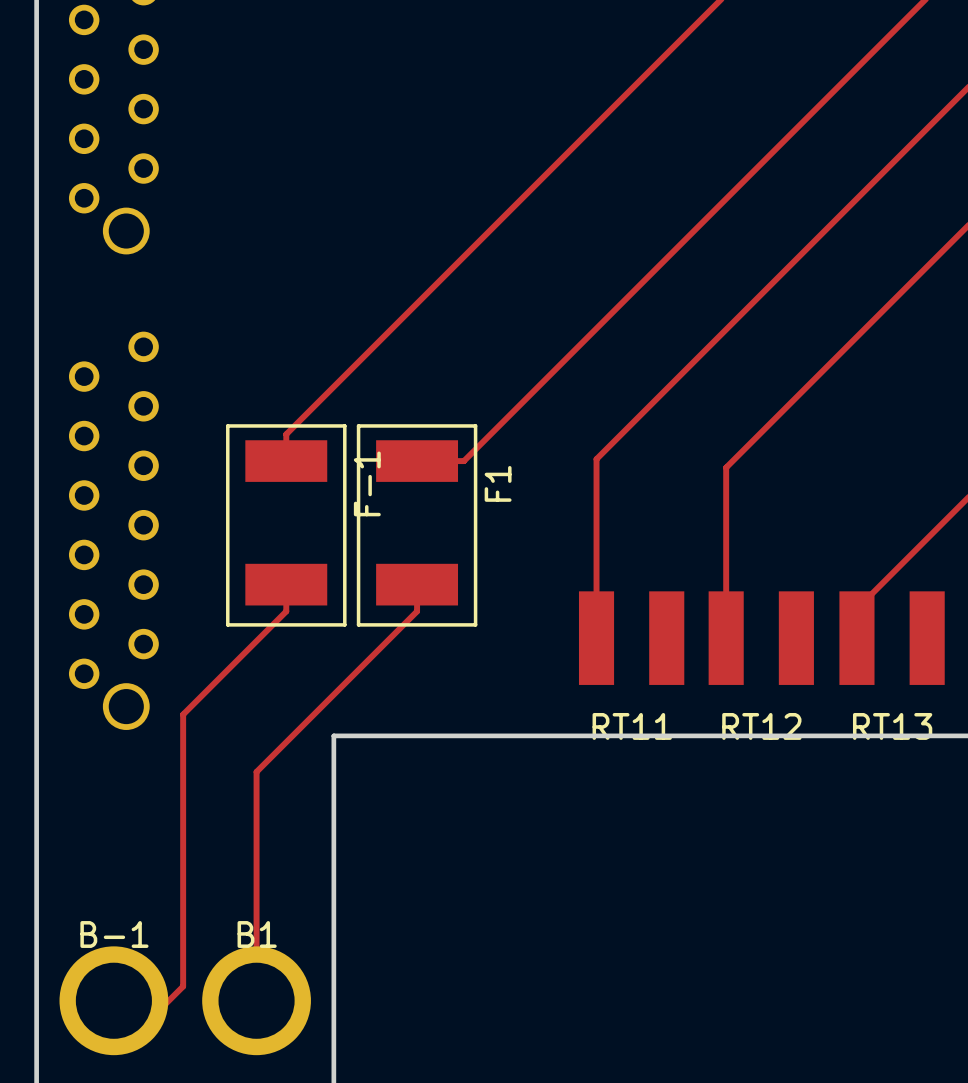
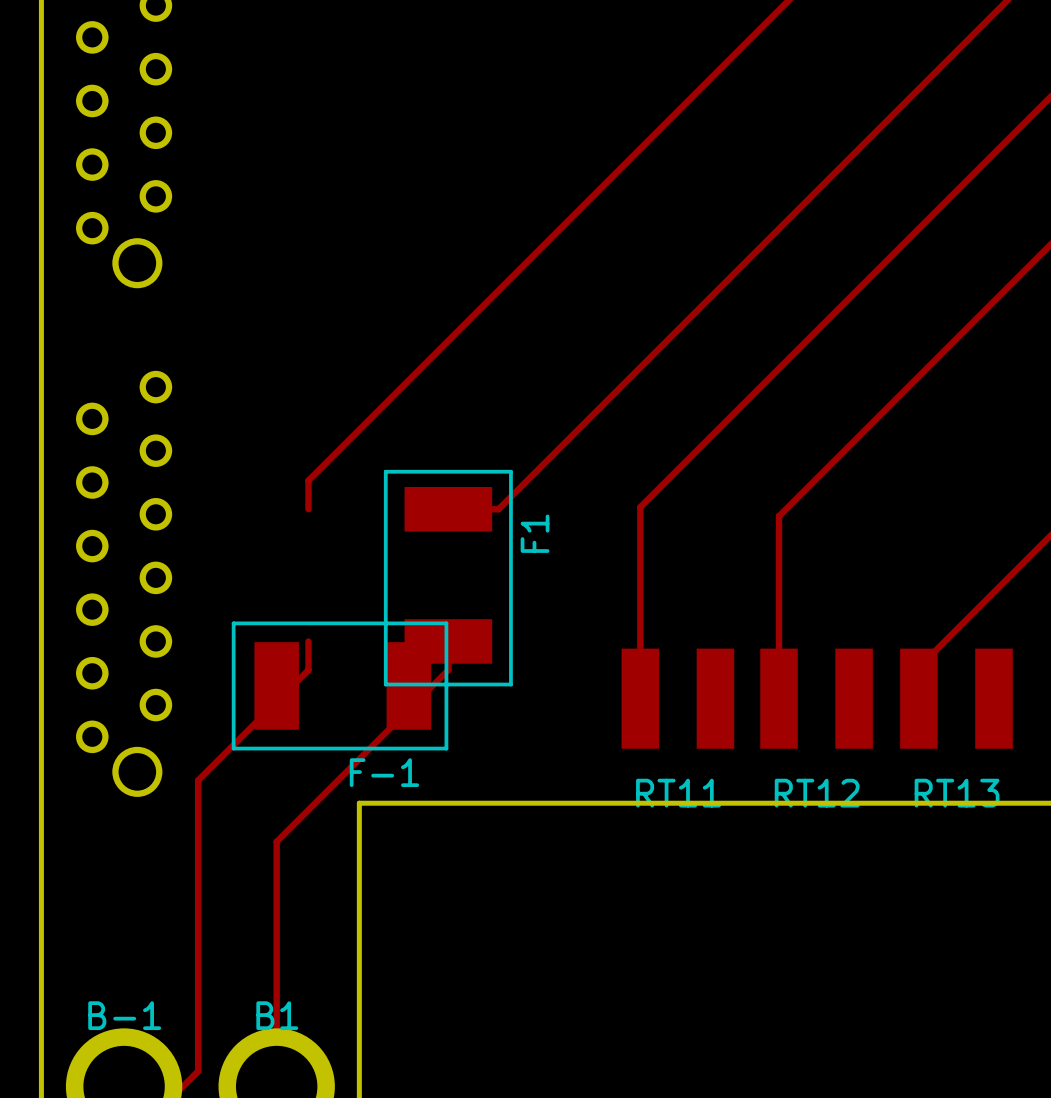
F-1 rotation: 0° (286, 525) -> 90° clockwise (340, 685)

